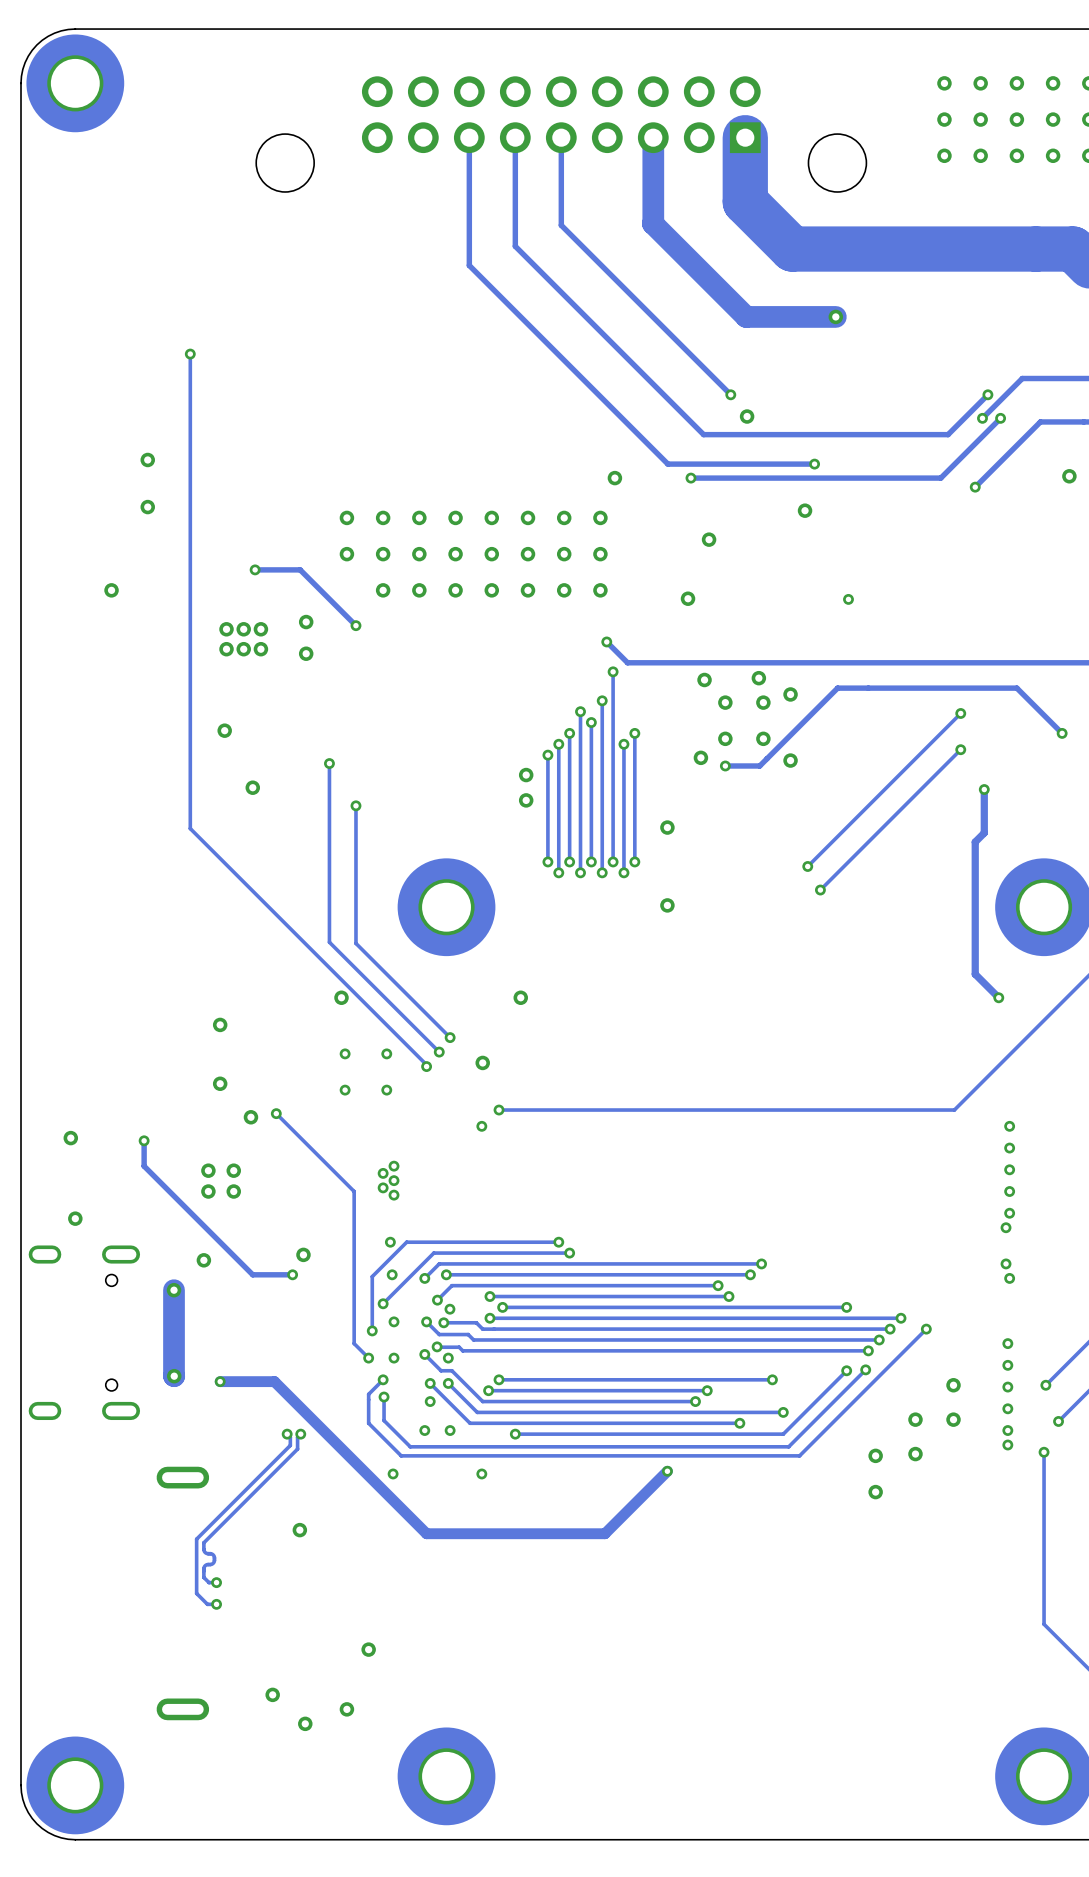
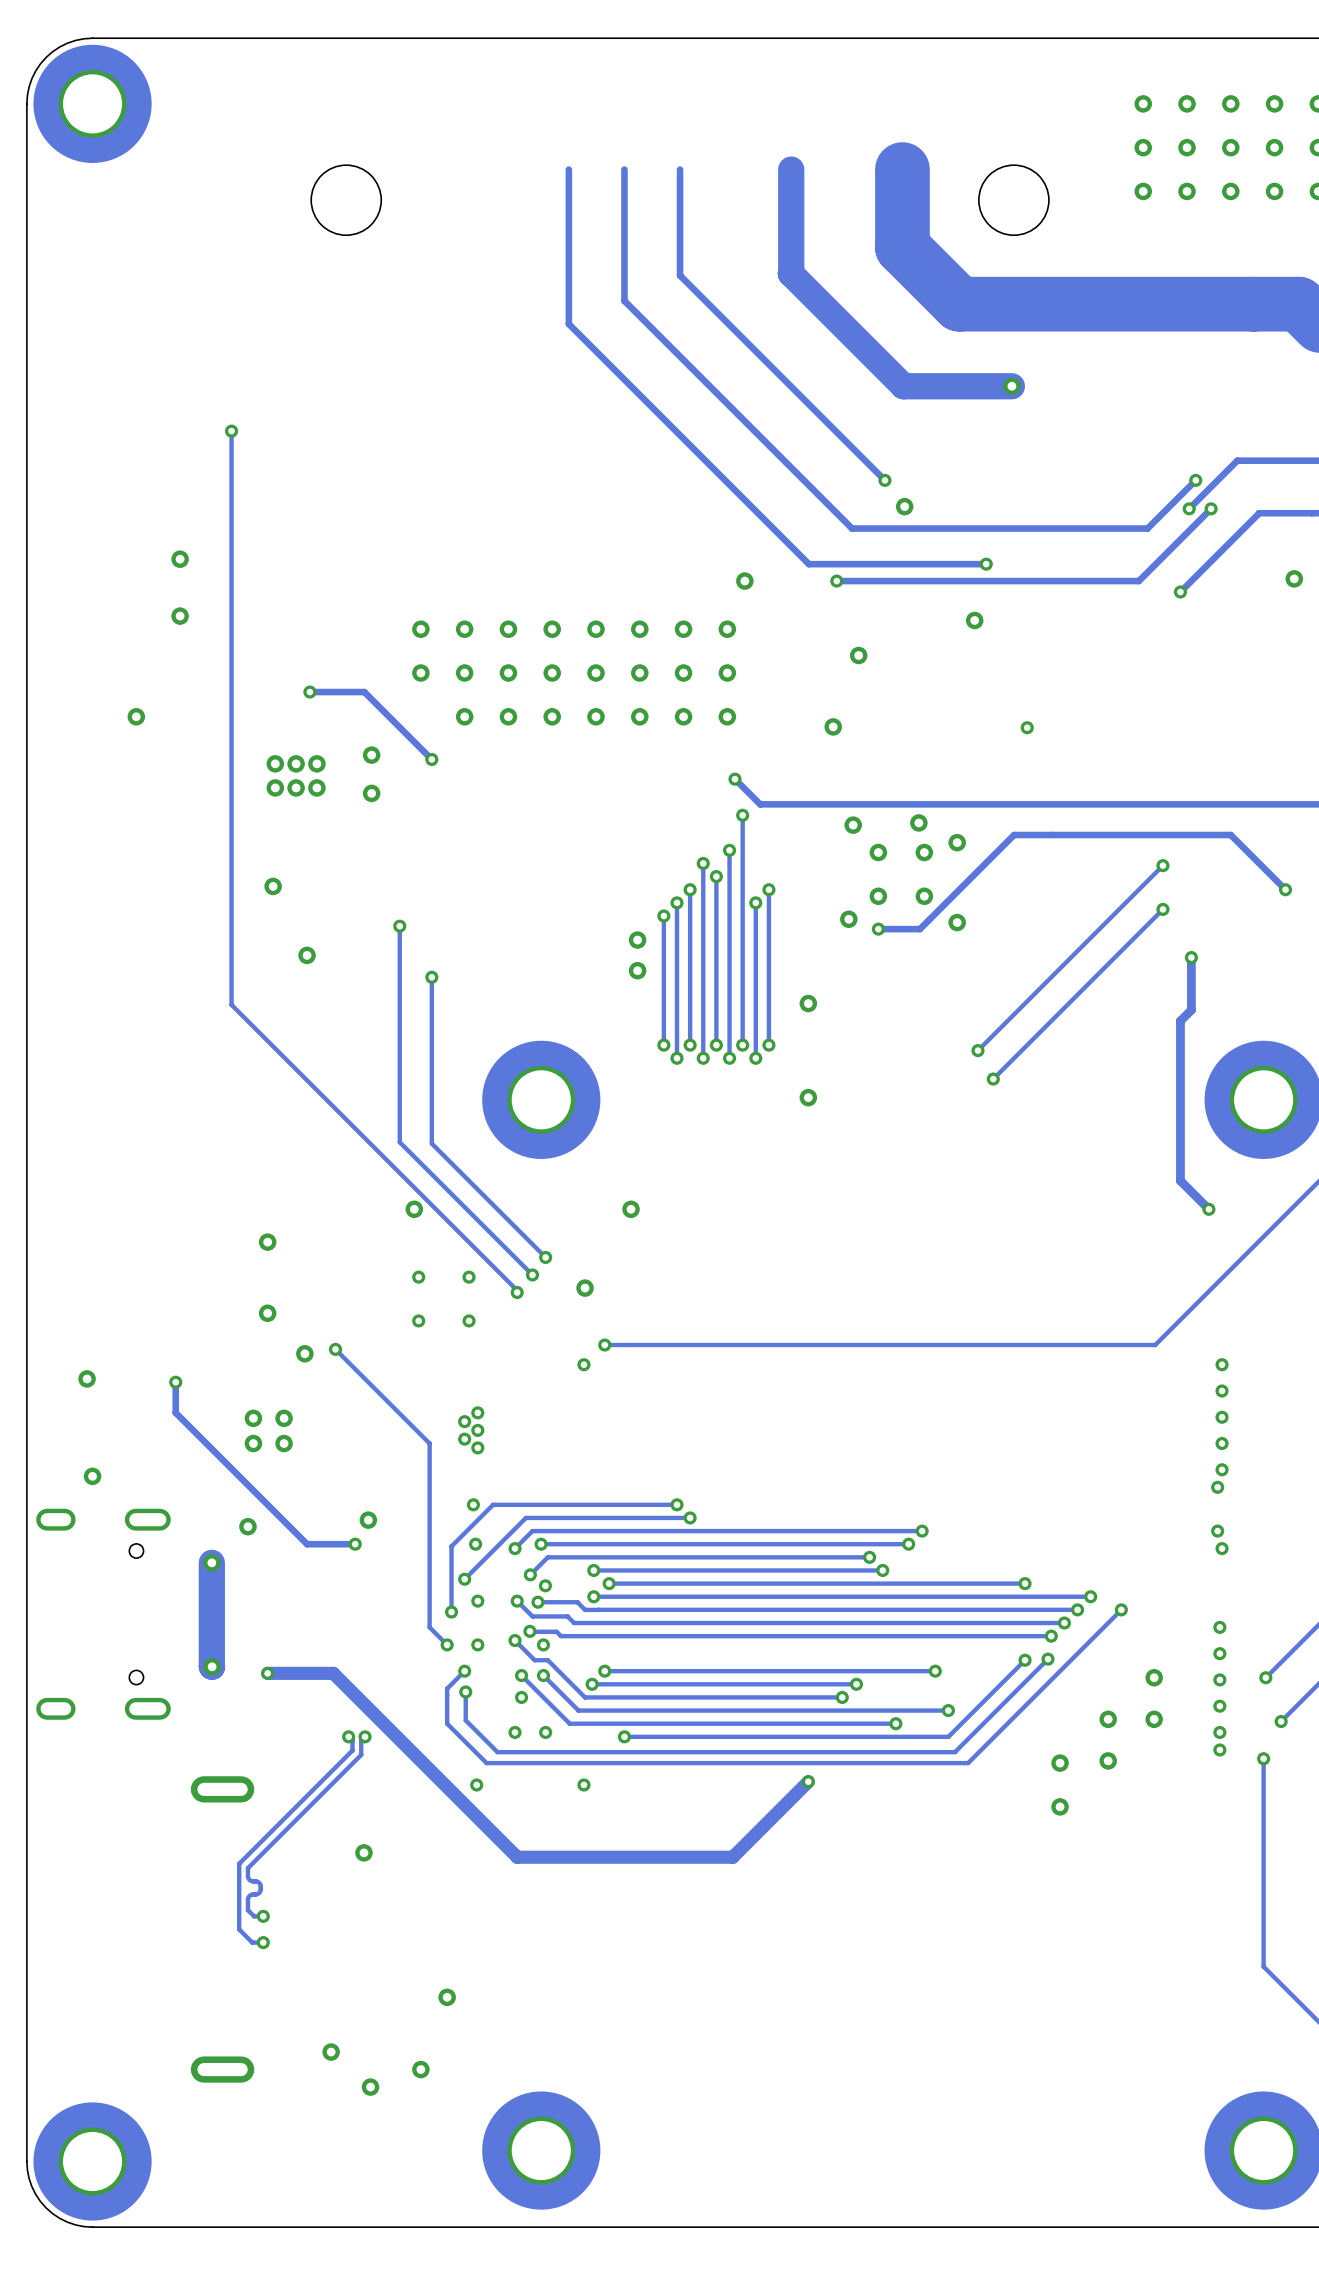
part: (561, 114) -> none

